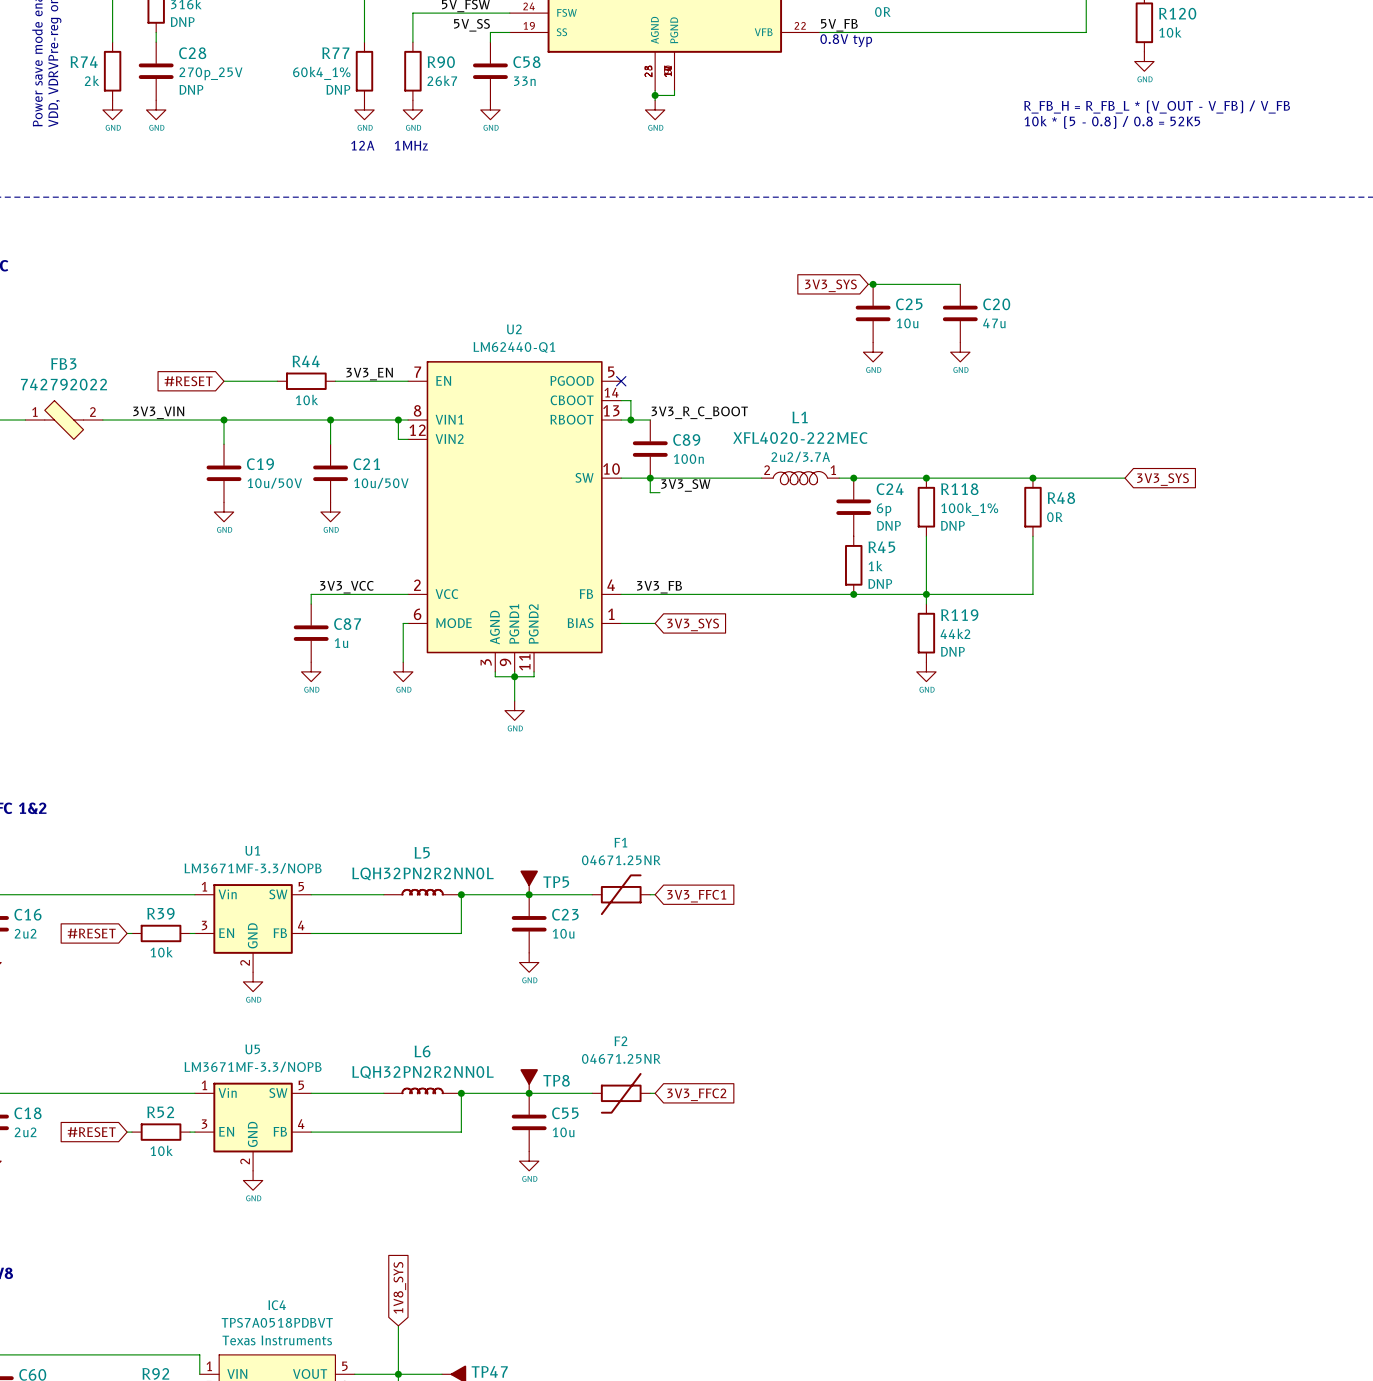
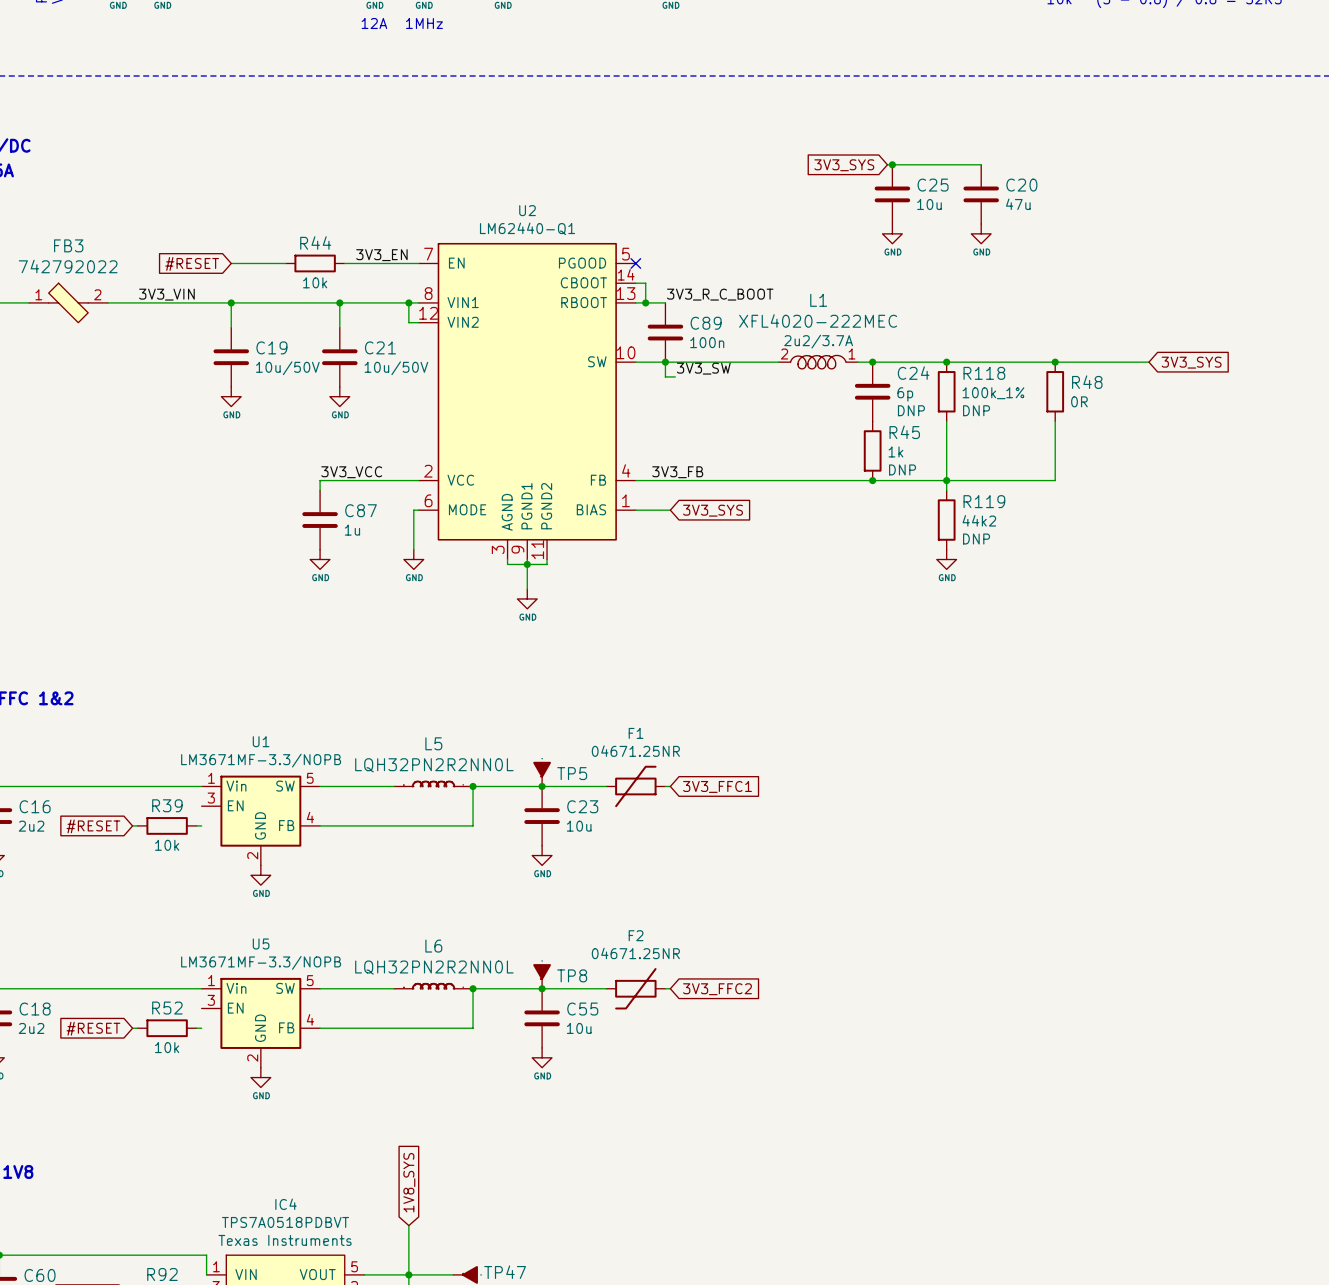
U1 symbol: [194, 884, 312, 973] -> [201, 775, 321, 866]
U5 symbol: [194, 1082, 312, 1171] -> [201, 977, 321, 1068]

